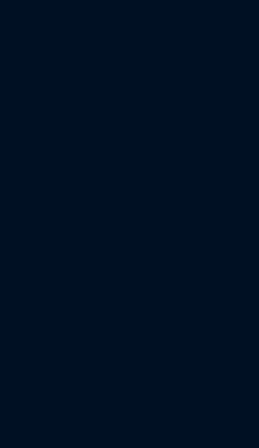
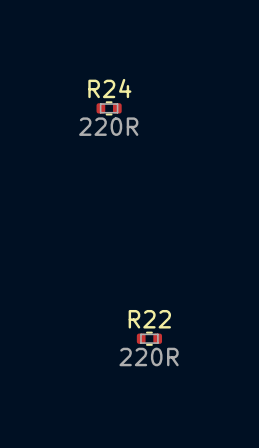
R24: none -> 220R (109, 108)
R22: none -> 220R (149, 338)

